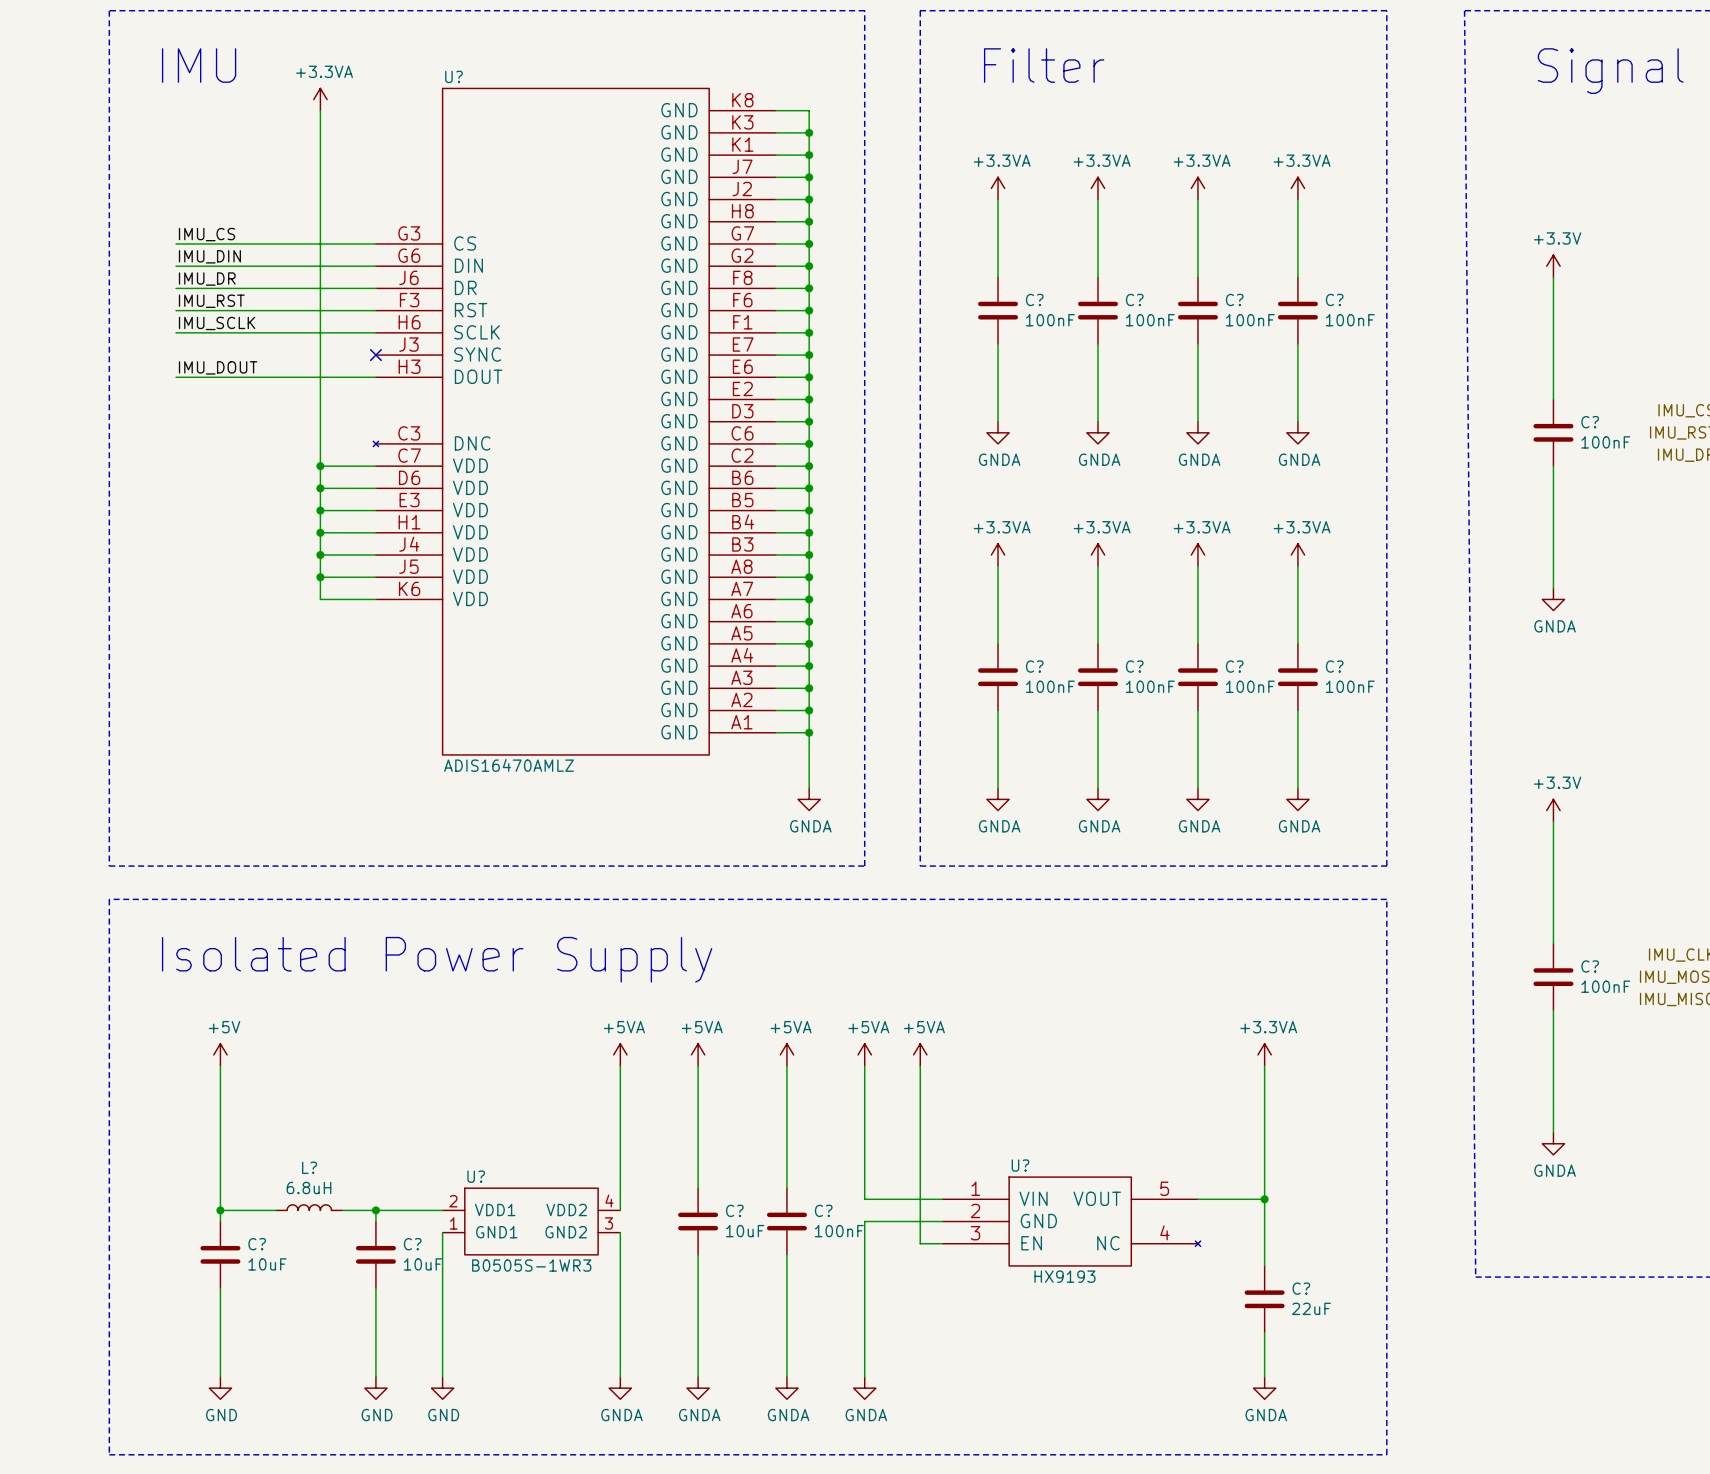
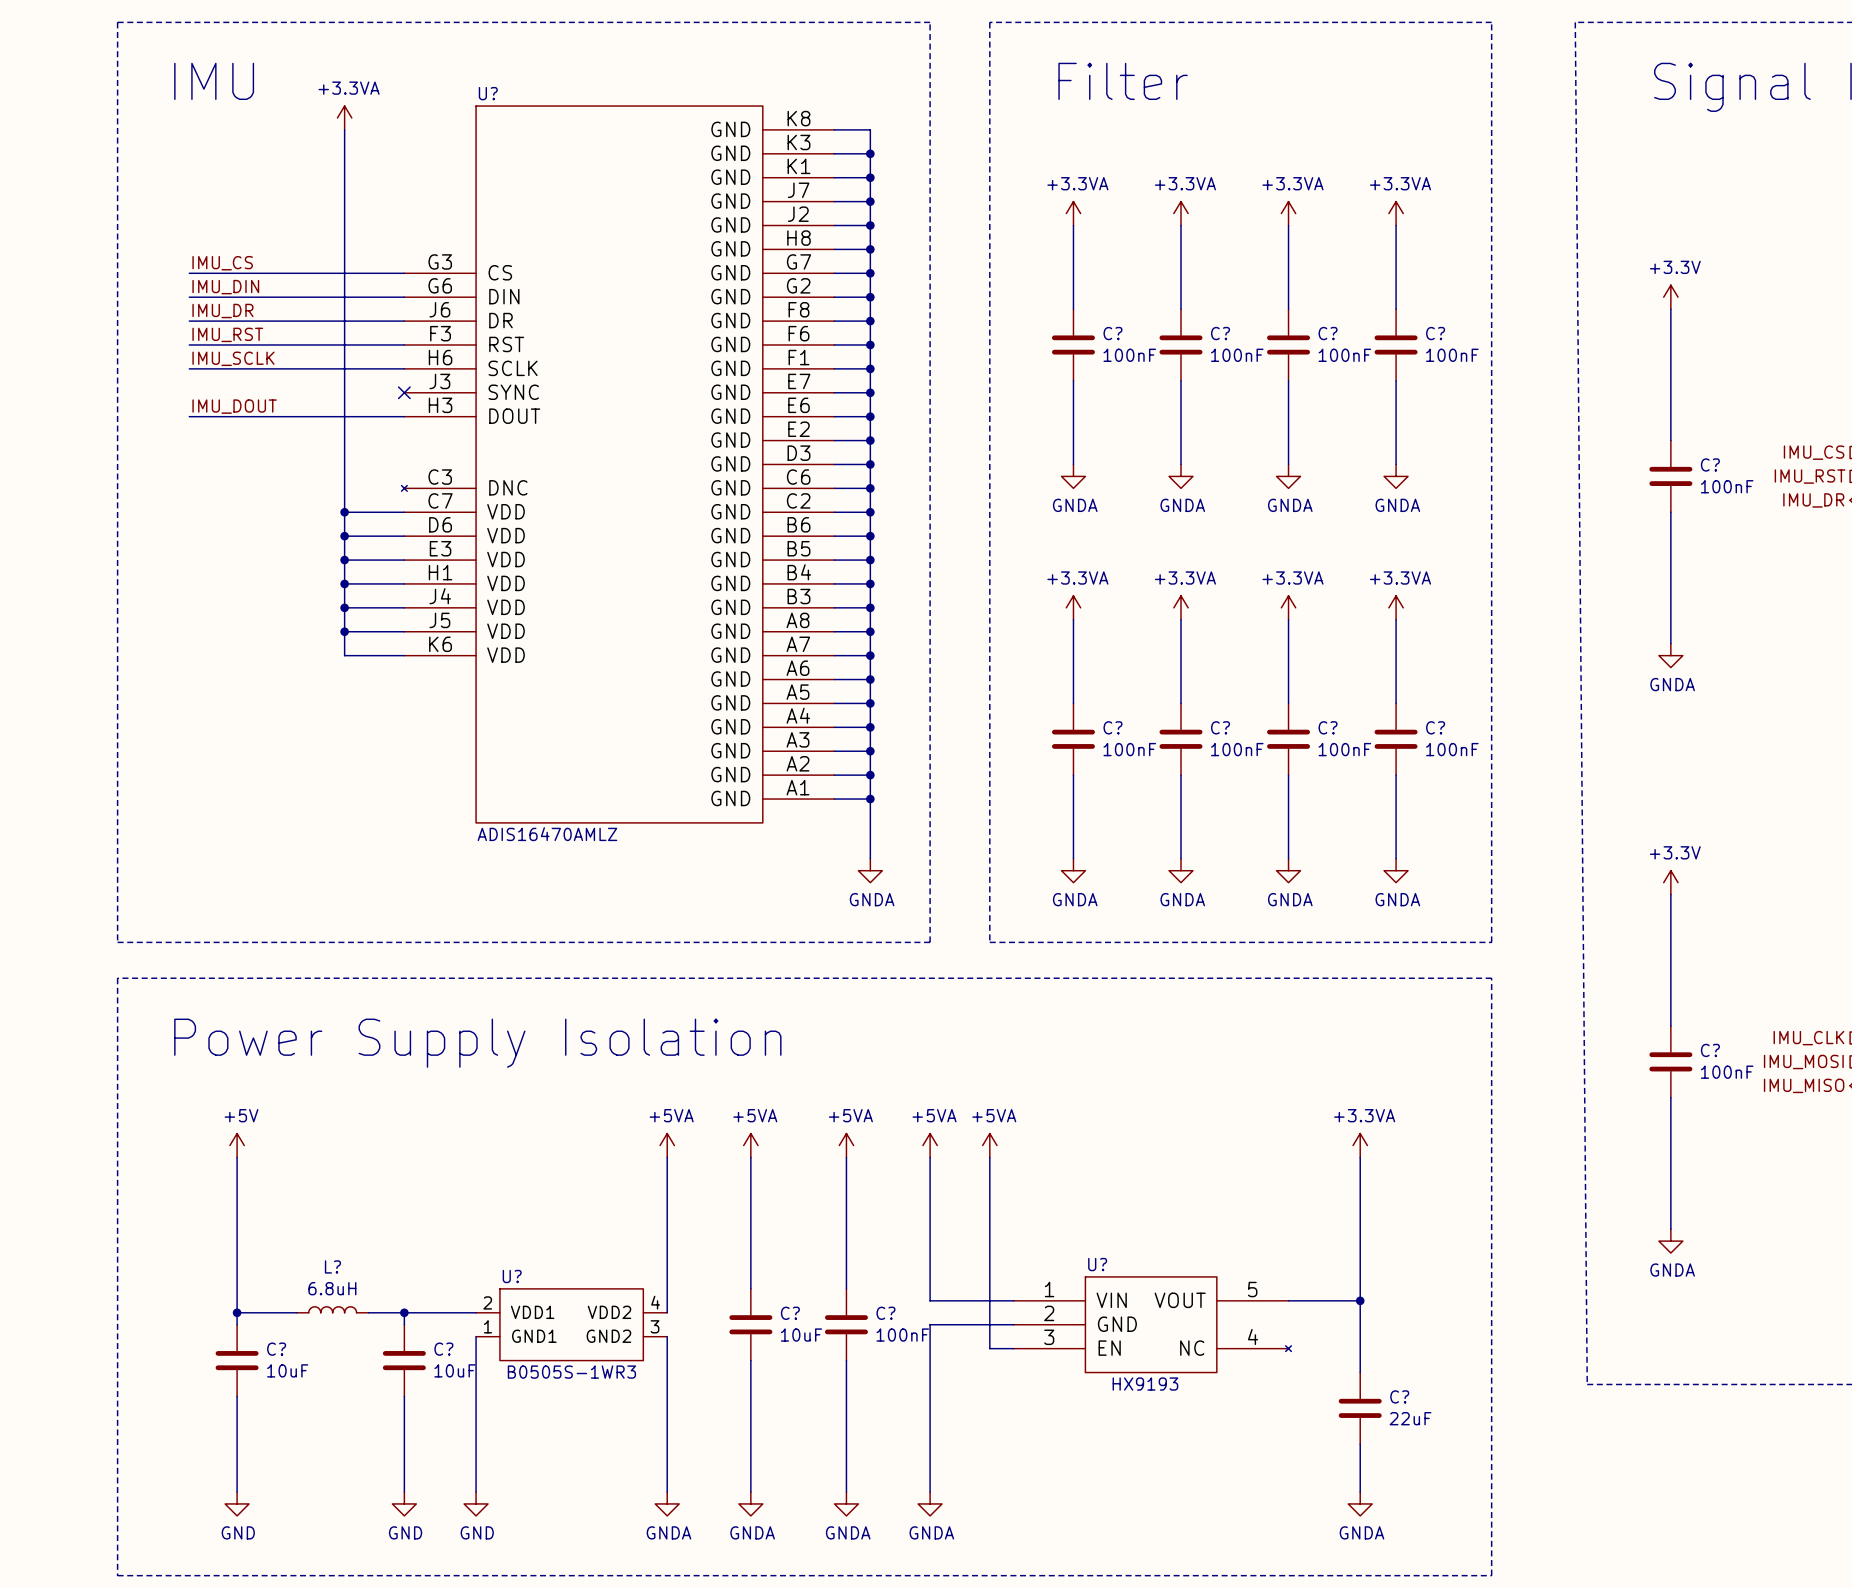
text: Isolated Power Supply (437, 959) -> Power Supply Isolation (477, 1043)

